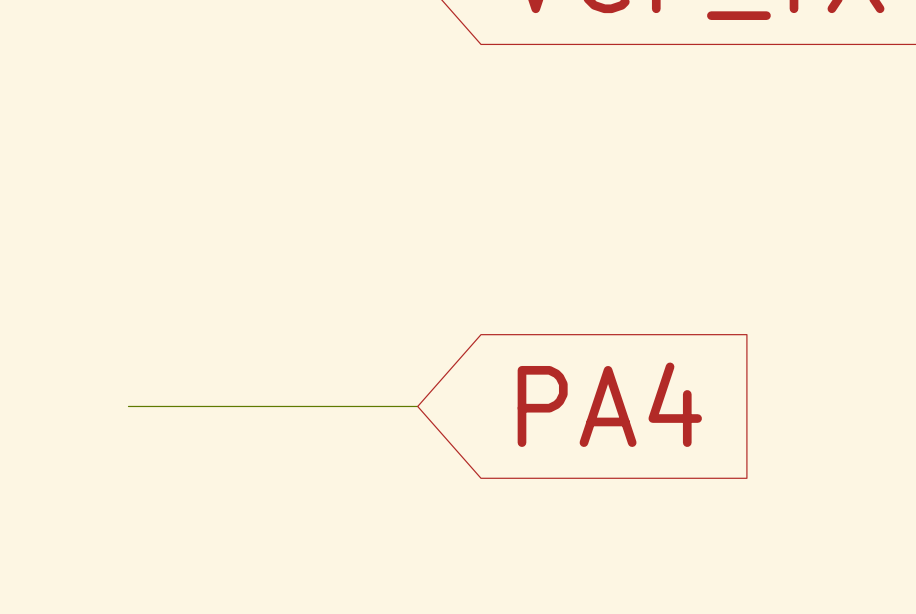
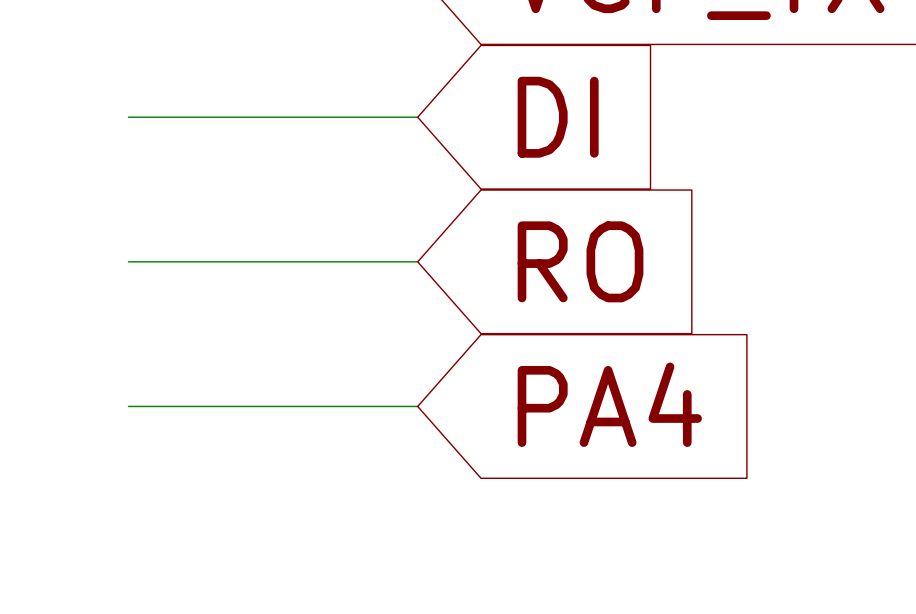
wire: none -> (128, 117) (417, 117)
global label: none -> DI (558, 117)
wire: none -> (128, 261) (417, 261)
global label: none -> RO (580, 261)

